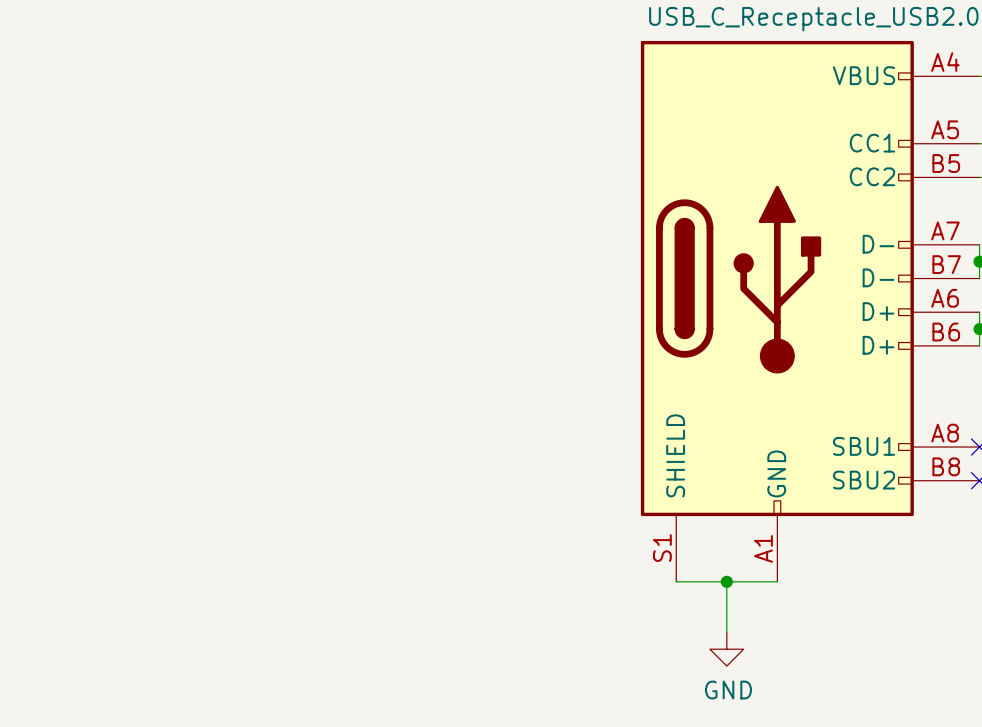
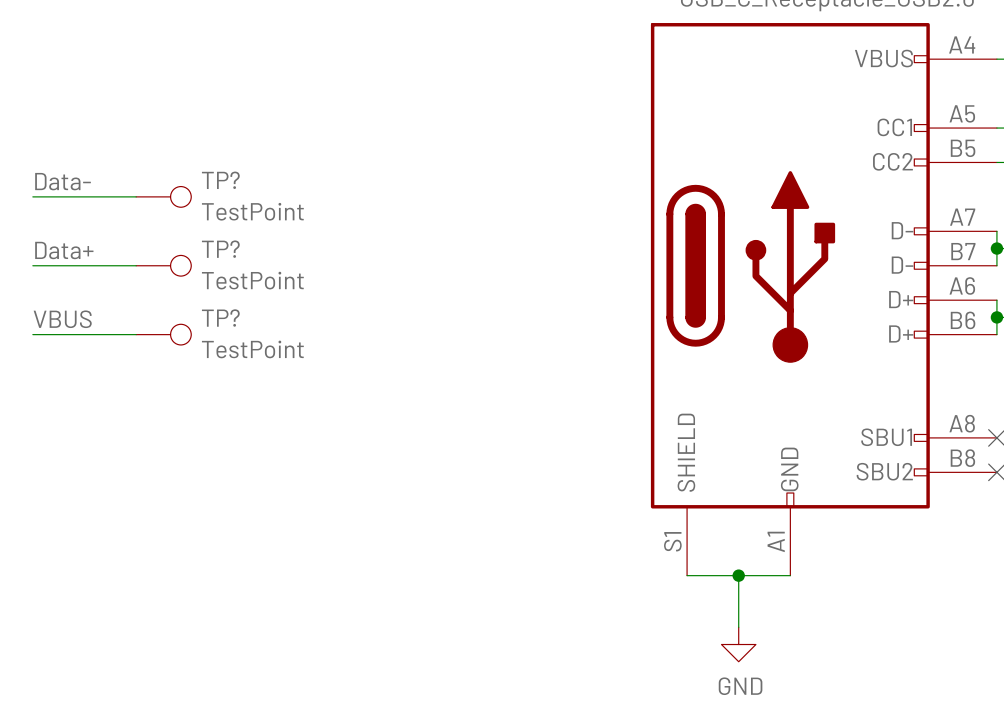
label: none -> Data- (63, 181)
wire: none -> (32, 196) (136, 196)
TP?: none -> TestPoint (163, 196)
label: none -> Data+ (64, 250)
wire: none -> (32, 265) (136, 265)
TP?: none -> TestPoint (163, 265)
label: none -> VBUS (62, 319)
wire: none -> (32, 334) (136, 334)
TP?: none -> TestPoint (163, 334)

